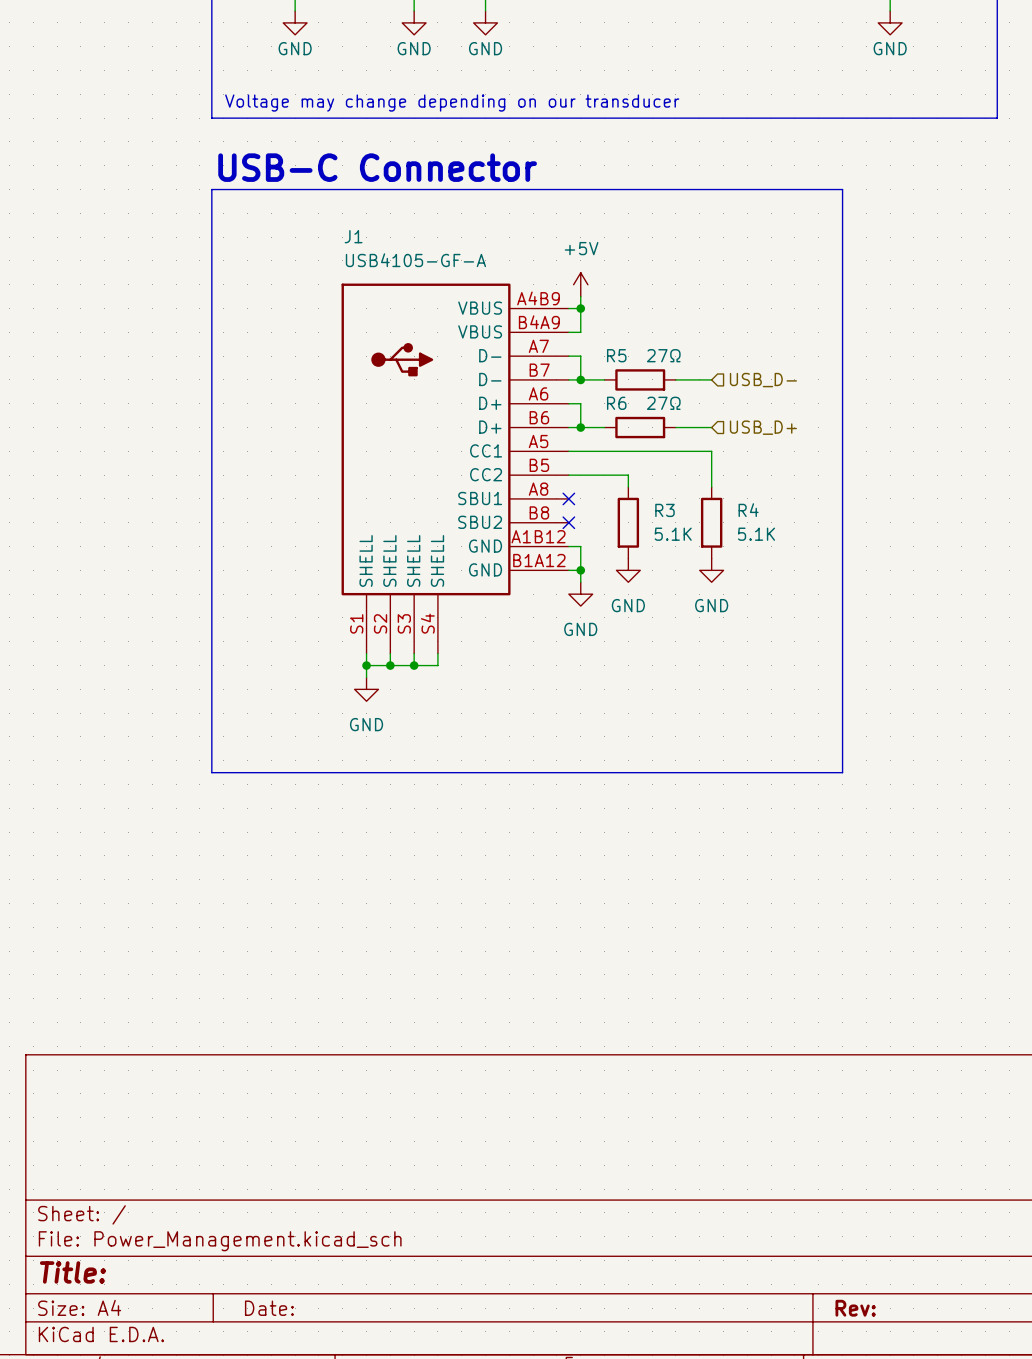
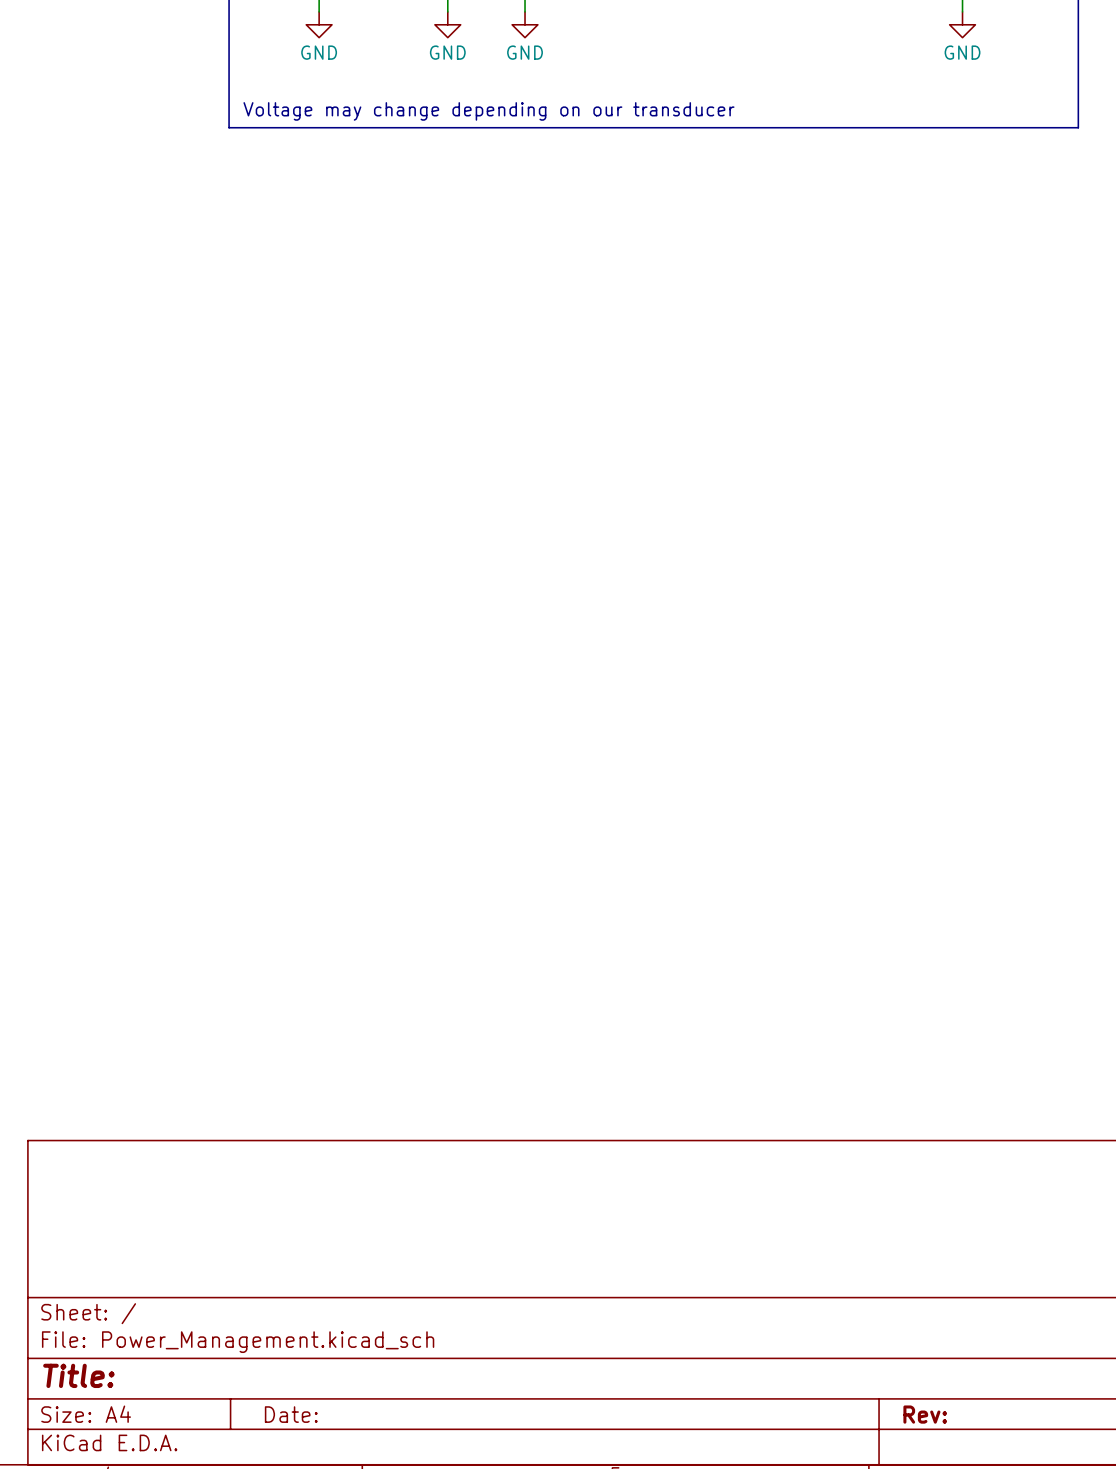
text: USB-C Connector (377, 167) -> none
line: (211, 189) (842, 189) (842, 772) (211, 772) (211, 189) -> none
power symbol: +5V (580, 284) -> none
wire: (580, 296) (580, 332) (568, 332) -> none
wire: (568, 308) (580, 308) -> none
junction: (580, 308) -> none
wire: (568, 356) (580, 356) (580, 379) -> none
wire: (568, 379) (604, 379) -> none
junction: (580, 379) -> none
R5: 27Ω (640, 379) -> none
wire: (675, 379) (711, 379) -> none
hierarchical label: USB_D- (763, 380) -> none
wire: (568, 403) (580, 403) (580, 427) -> none
wire: (568, 427) (604, 427) -> none
junction: (580, 427) -> none
R6: 27Ω (640, 427) -> none
wire: (675, 427) (711, 427) -> none
hierarchical label: USB_D+ (763, 427) -> none
wire: (568, 451) (711, 451) (711, 487) -> none
J1: USB4105-GF-A (455, 468) -> none
wire: (568, 475) (628, 475) (628, 487) -> none
no-connect mark: (568, 498) -> none
no-connect mark: (568, 522) -> none
R3: 5.1K (628, 522) -> none
R4: 5.1K (711, 522) -> none
wire: (568, 546) (580, 546) (580, 582) -> none
wire: (568, 570) (580, 570) -> none
junction: (580, 570) -> none
power symbol: GND (628, 570) -> none
power symbol: GND (711, 570) -> none
power symbol: GND (580, 594) -> none
wire: (366, 653) (366, 677) -> none
wire: (390, 653) (390, 665) -> none
wire: (414, 653) (414, 665) -> none
wire: (437, 653) (437, 665) (366, 665) -> none
junction: (366, 665) -> none
junction: (390, 665) -> none
junction: (414, 665) -> none
power symbol: GND (366, 689) -> none

